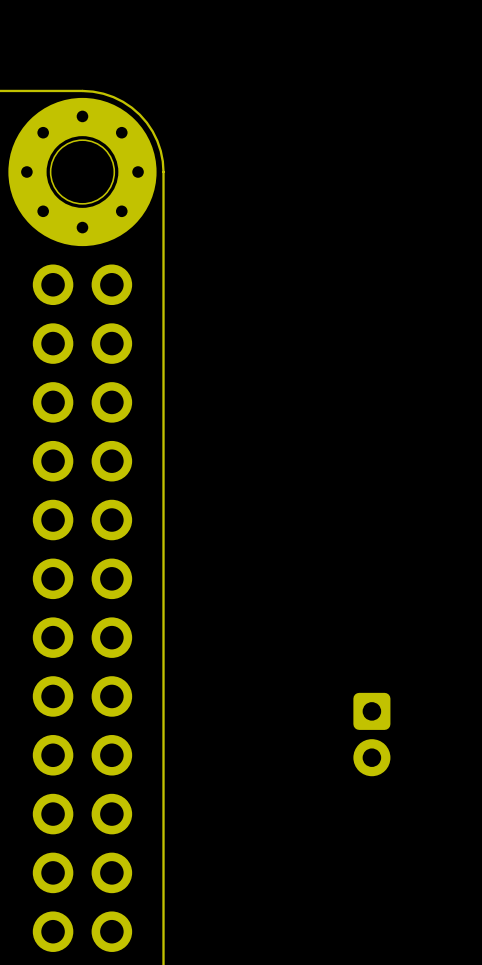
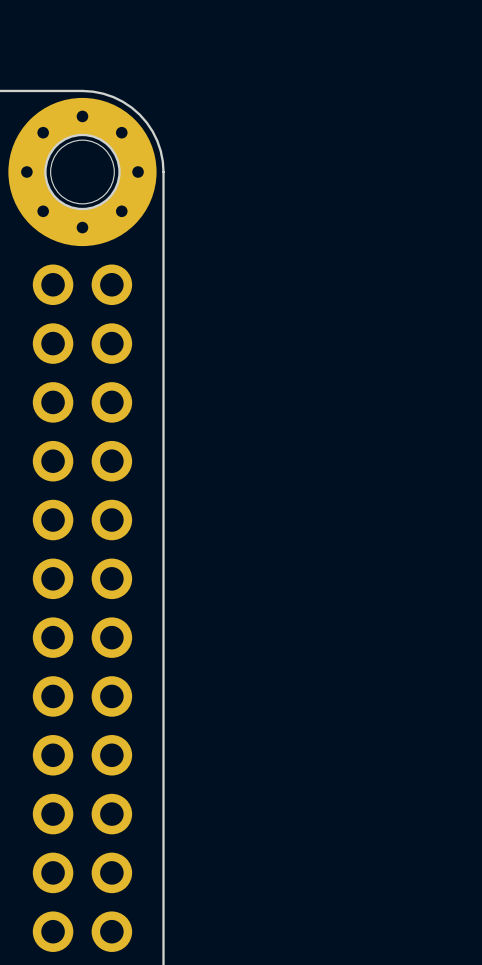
part: (371, 734) -> none

